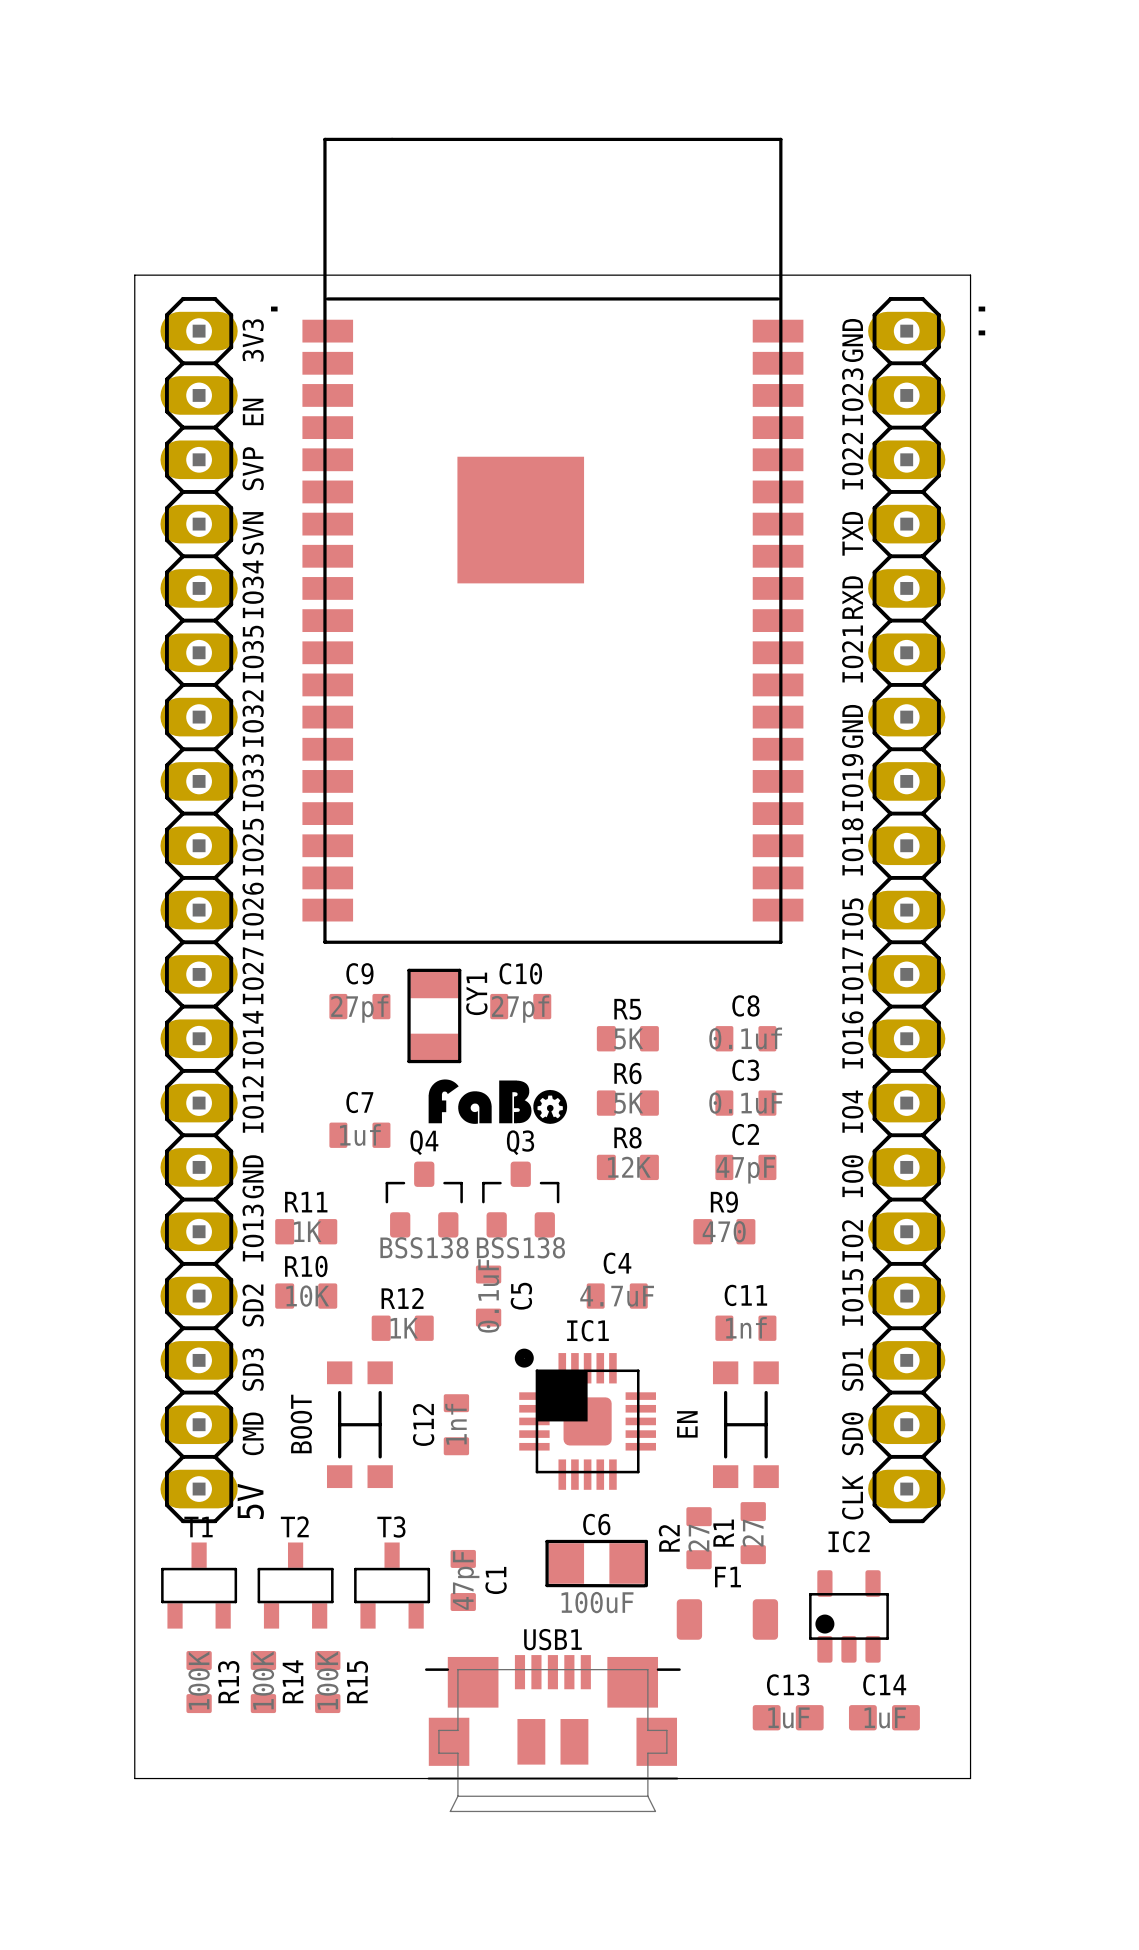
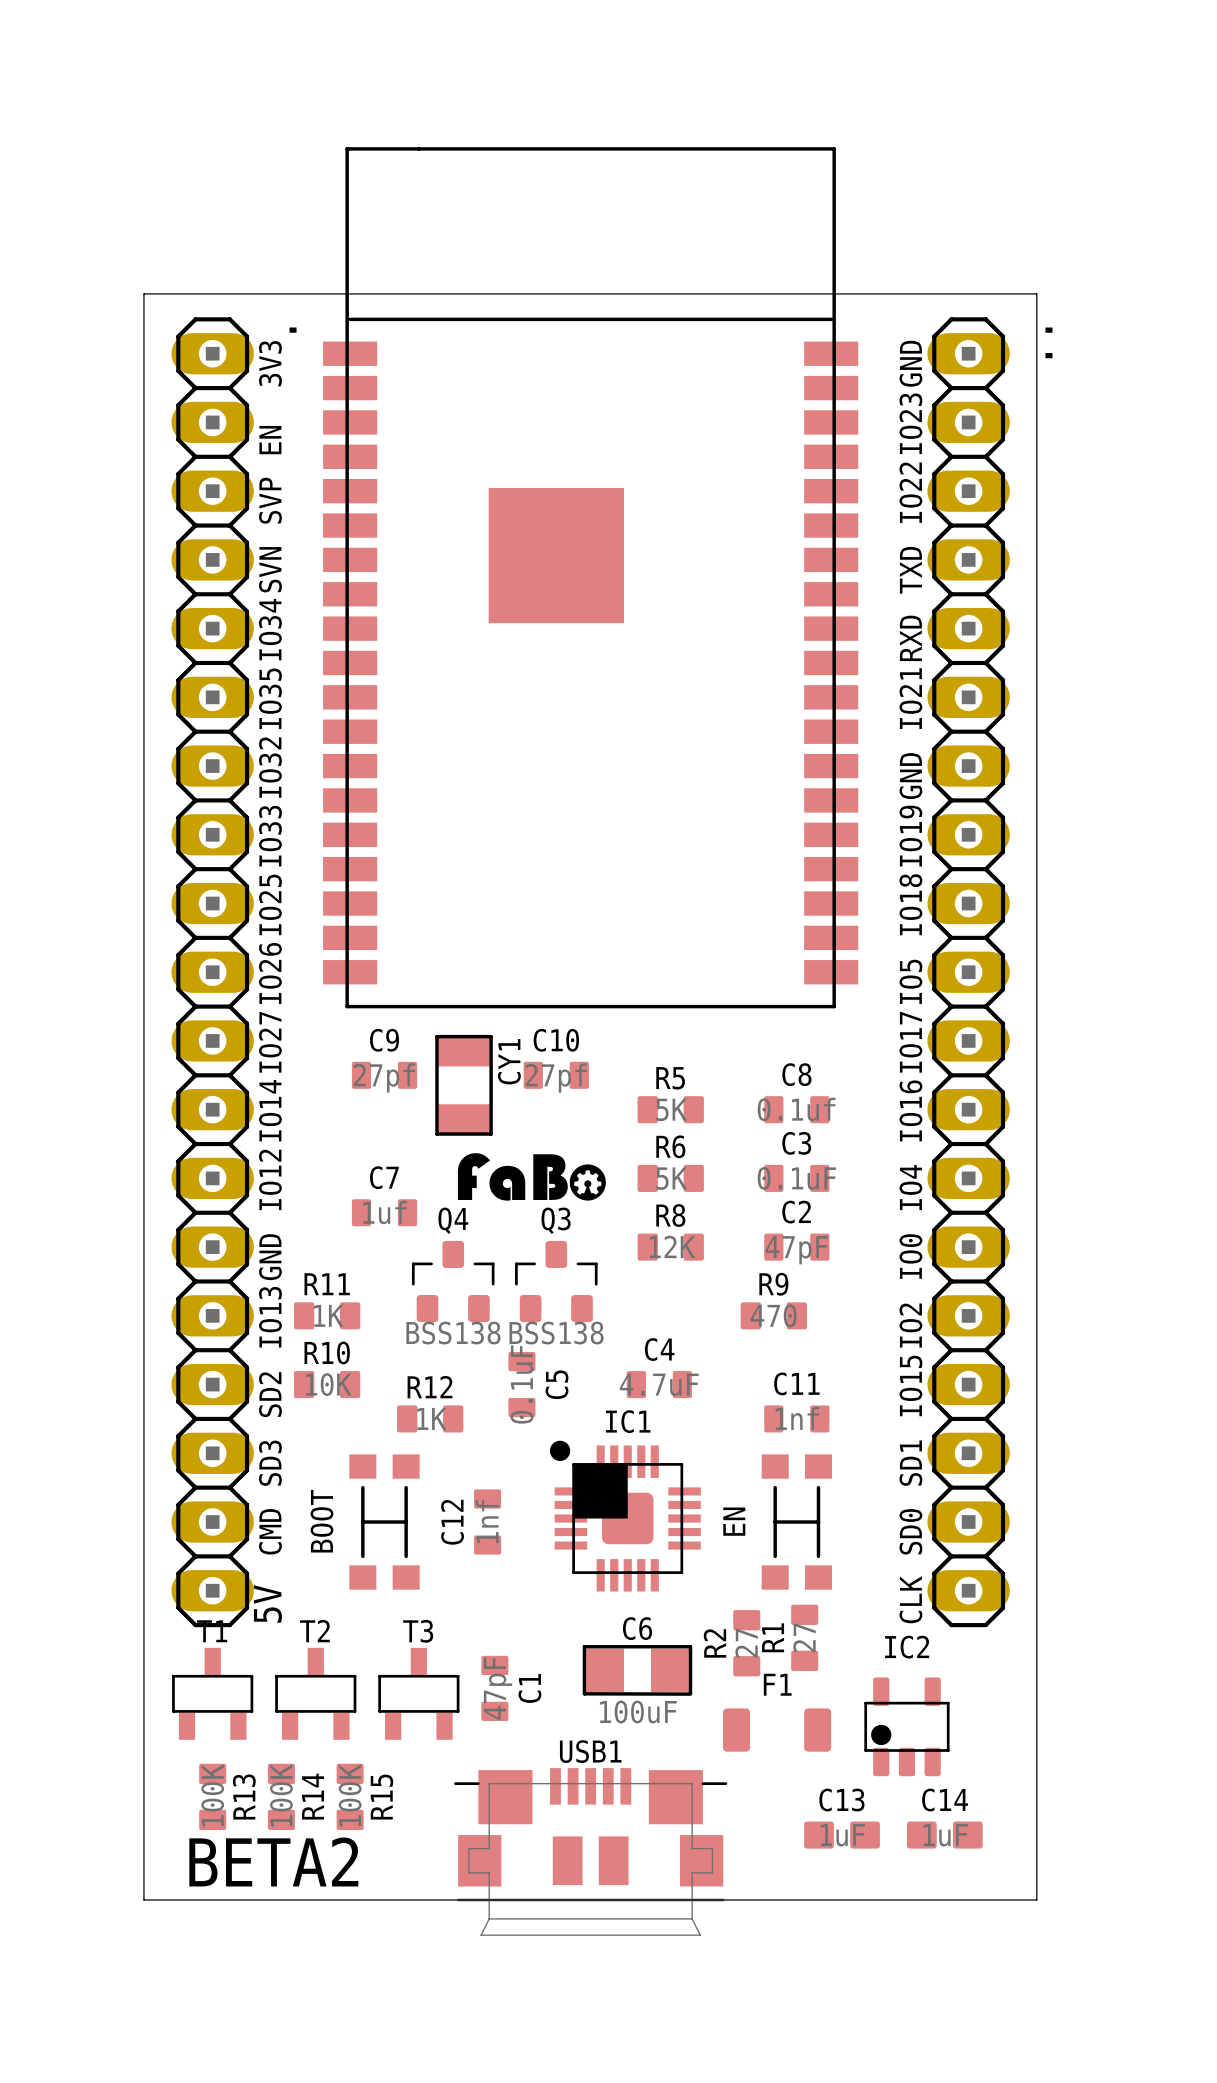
text: none -> BETA2 (273, 1861)

